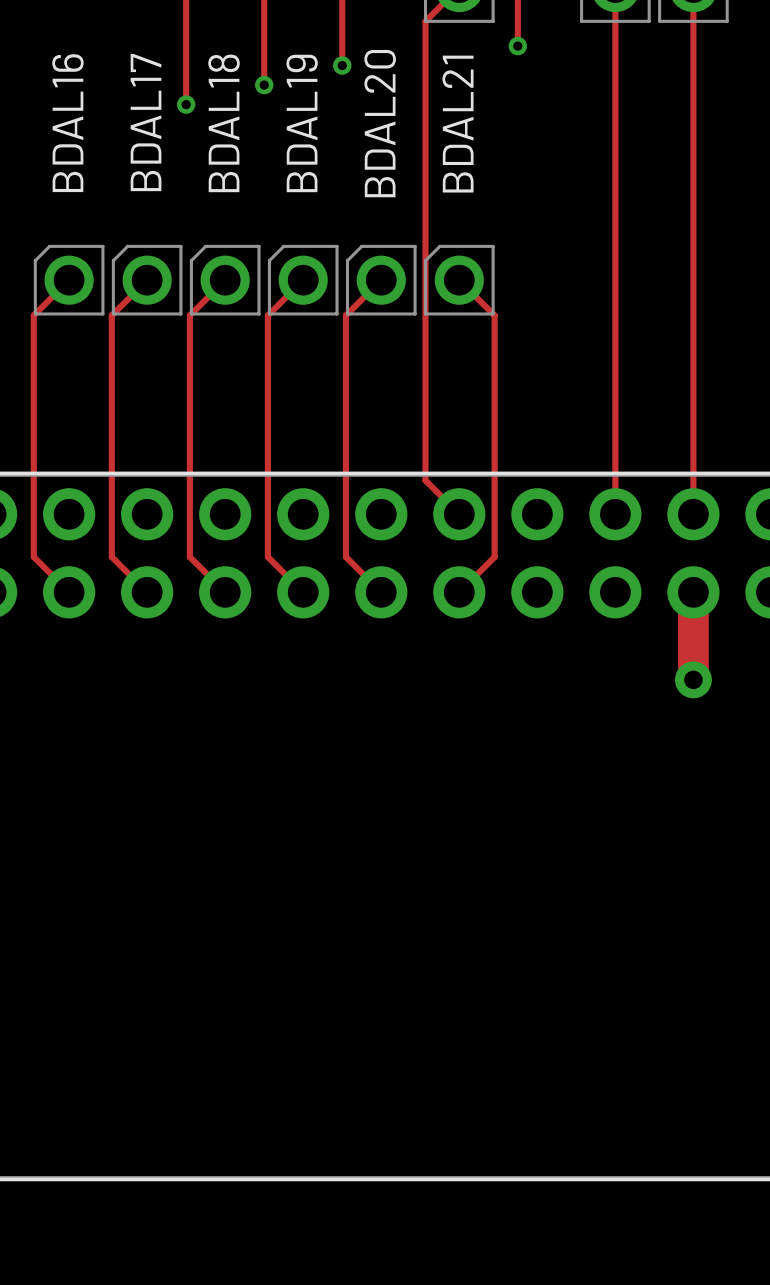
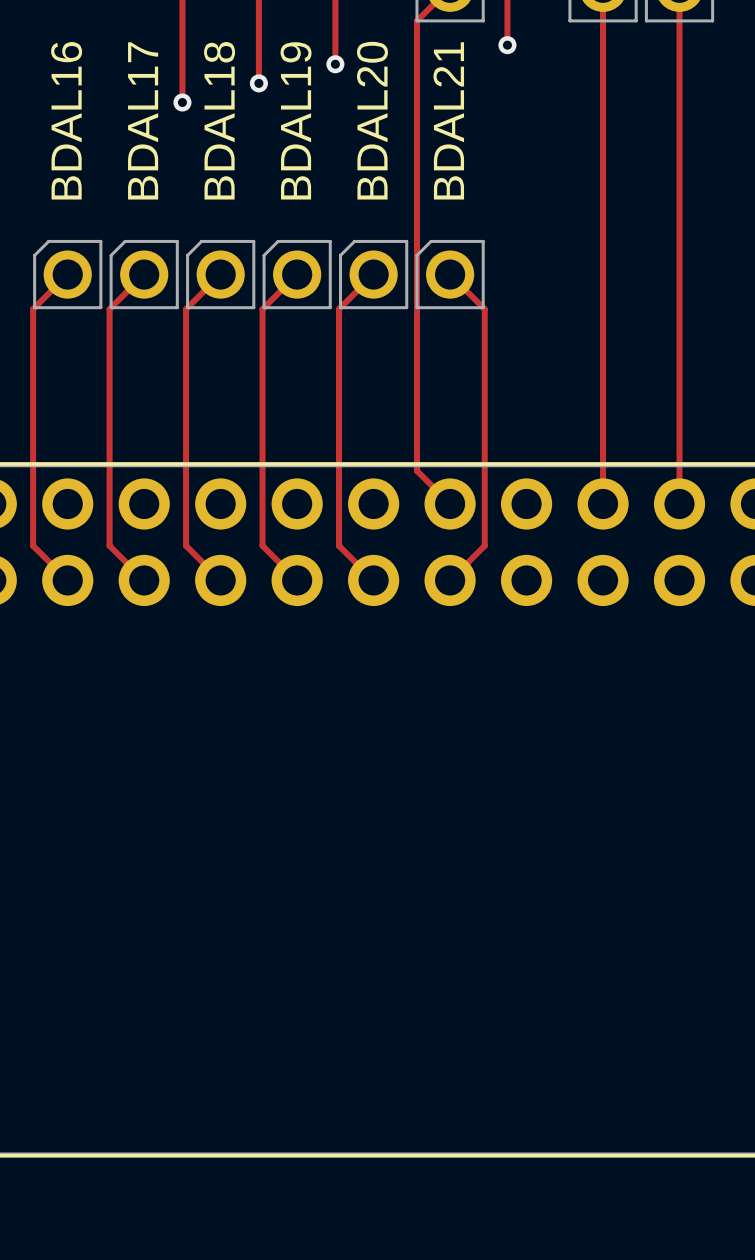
track: (693, 592) (693, 679) -> none
via: (693, 679) -> none

